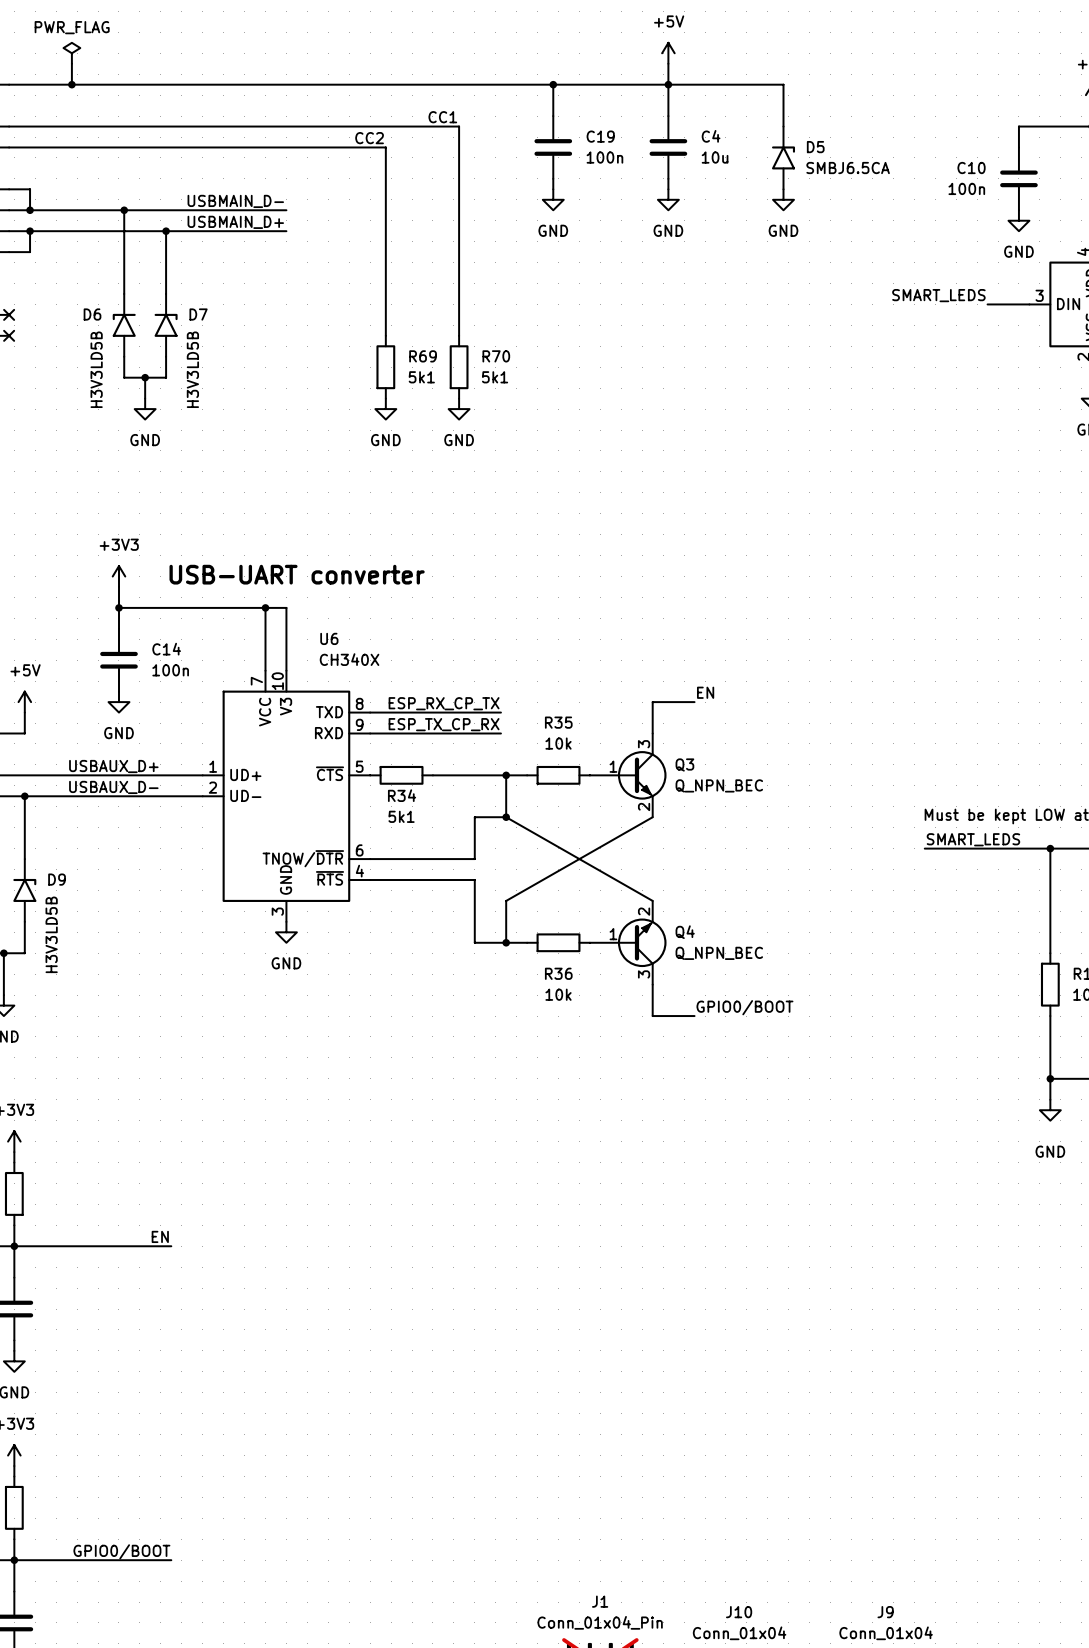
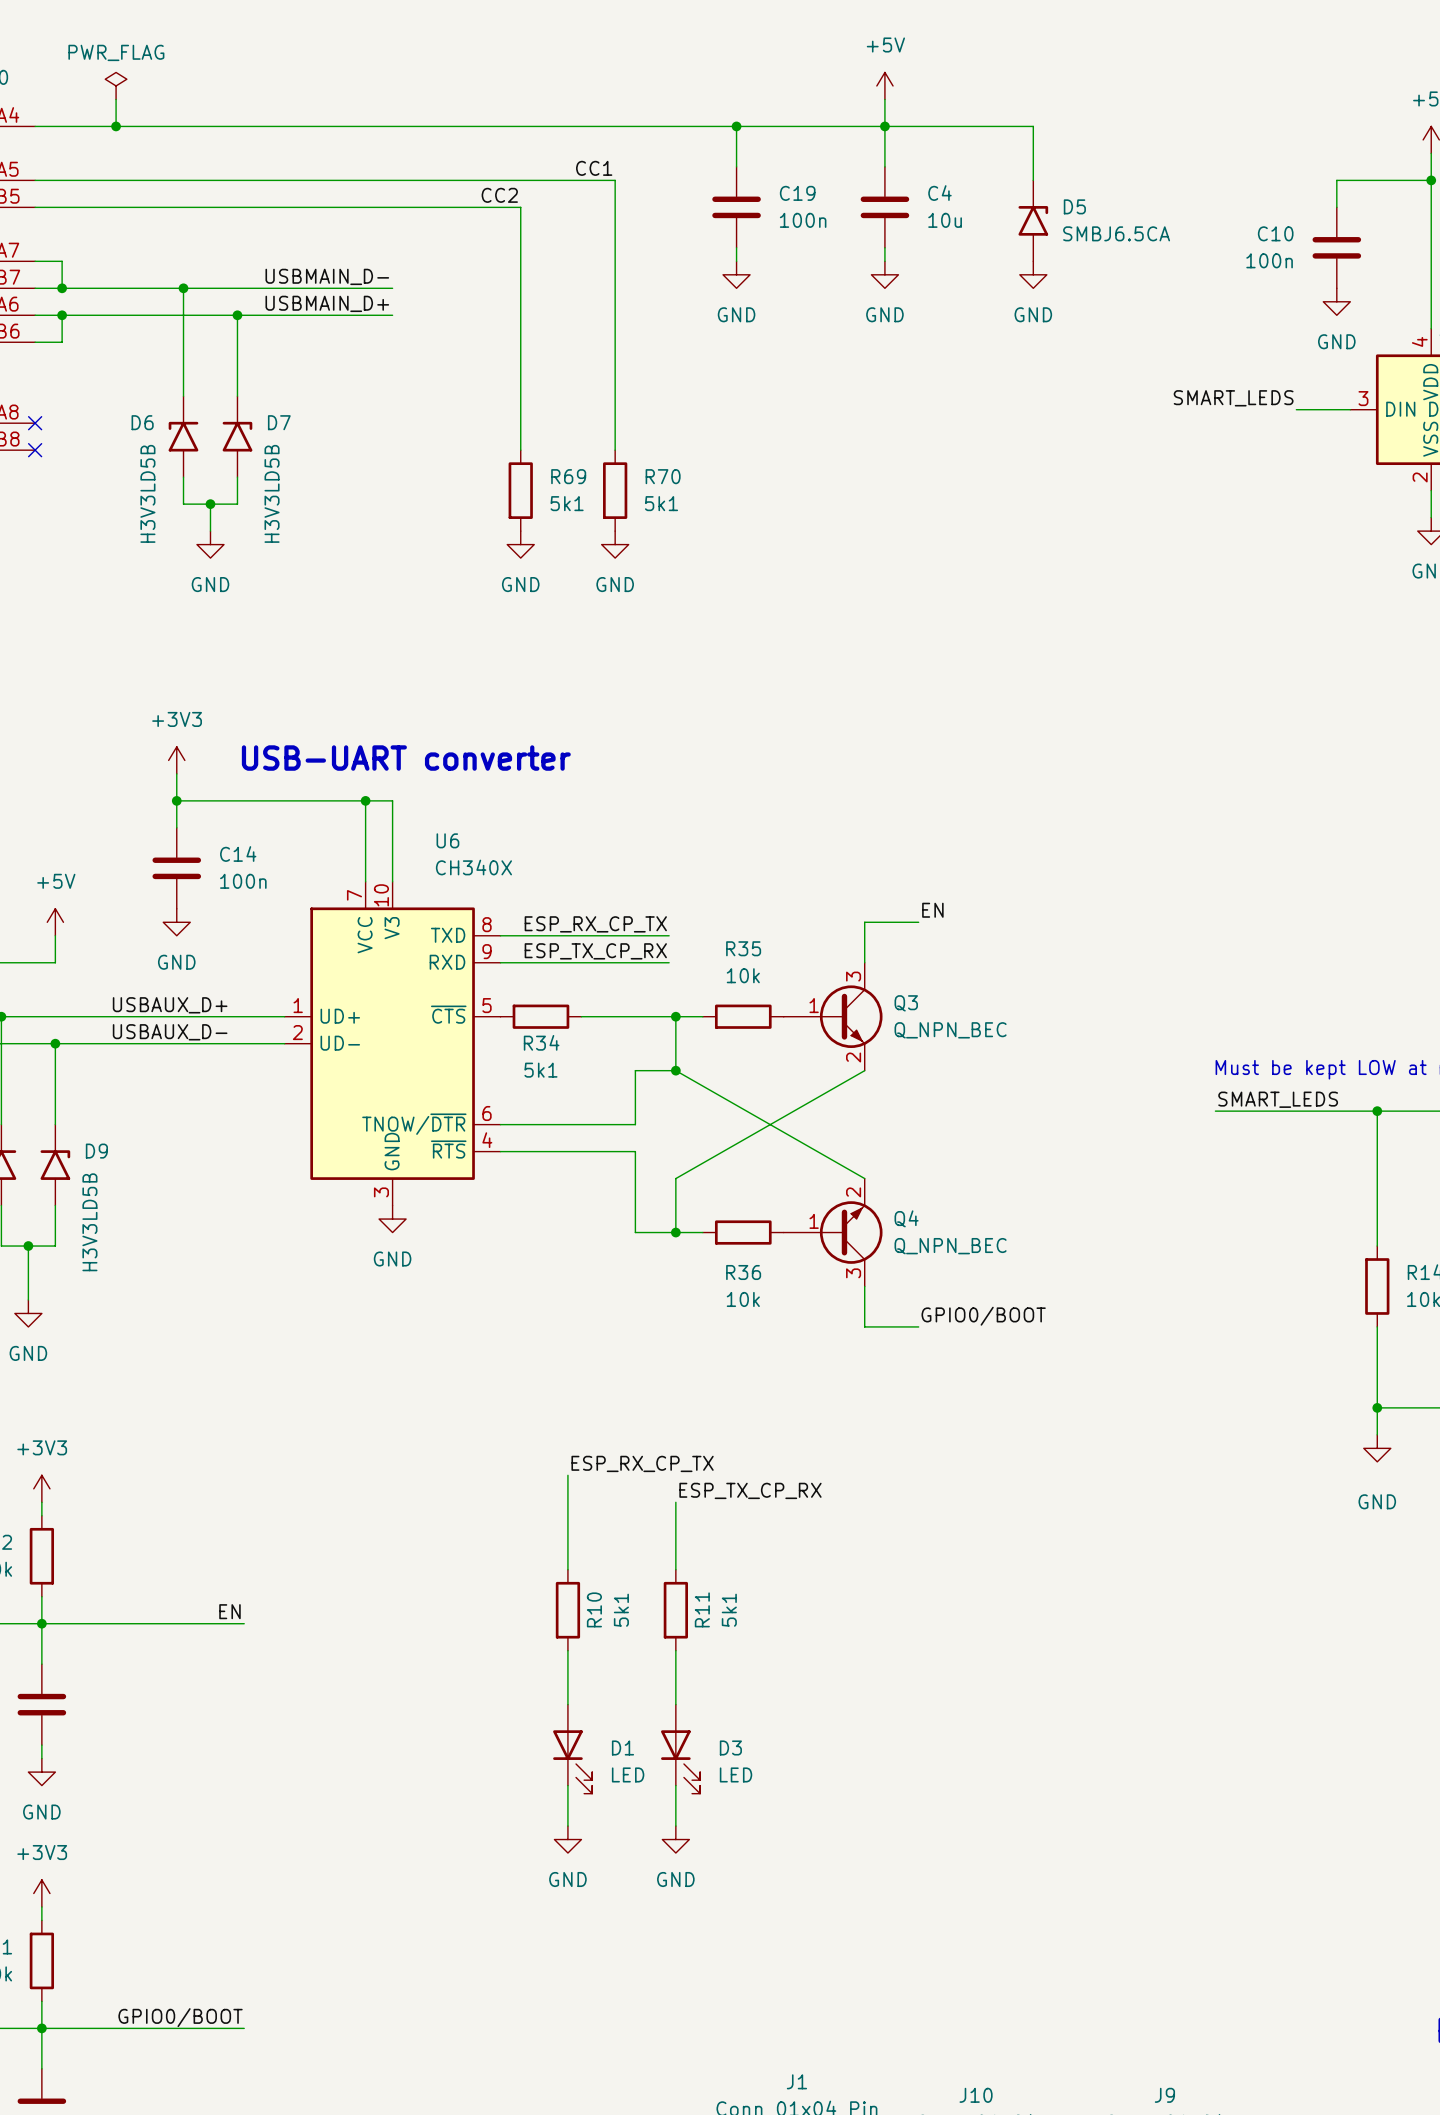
label: none -> ESP_RX_CP_TX (642, 1463)
wire: none -> (567, 1475) (567, 1569)
label: none -> ESP_TX_CP_RX (750, 1490)
wire: none -> (675, 1502) (675, 1569)
R10: none -> 5k1 (567, 1610)
R11: none -> 5k1 (675, 1610)
wire: none -> (567, 1650) (567, 1704)
wire: none -> (675, 1650) (675, 1704)
D1: none -> LED (572, 1749)
D3: none -> LED (680, 1749)
wire: none -> (567, 1785) (567, 1826)
wire: none -> (675, 1785) (675, 1826)
power symbol: none -> GND (567, 1839)
power symbol: none -> GND (675, 1839)

